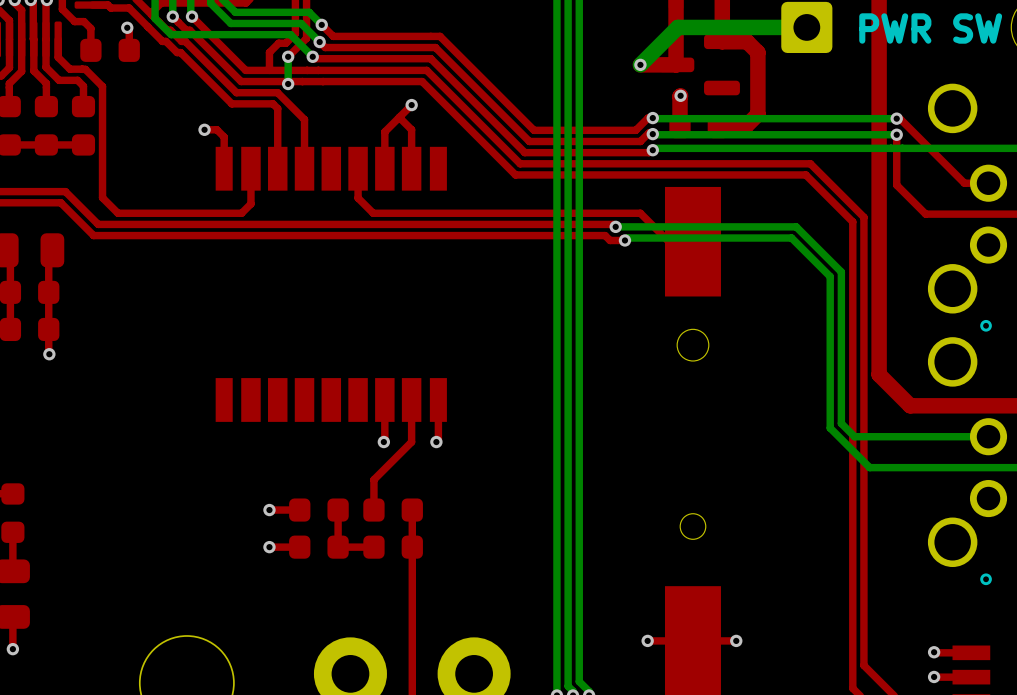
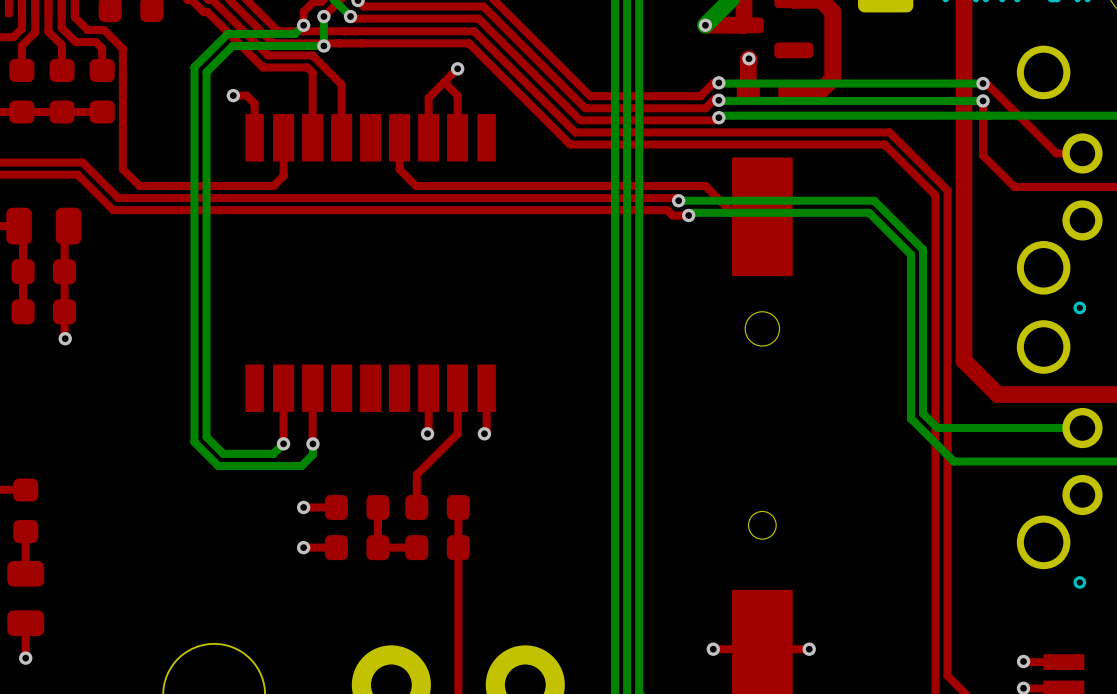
bottom track: none -> (303, 25) (295, 33) (227, 33) (194, 67) (194, 442) (218, 465) (301, 465) (312, 454) (312, 443)
via: none -> (303, 25)
bottom track: none -> (323, 45) (232, 45) (206, 72) (206, 437) (223, 453) (273, 453) (283, 443)
top track: none -> (312, 388) (312, 442)
top track: none -> (283, 388) (283, 443)
via: none -> (283, 443)
via: none -> (312, 443)

